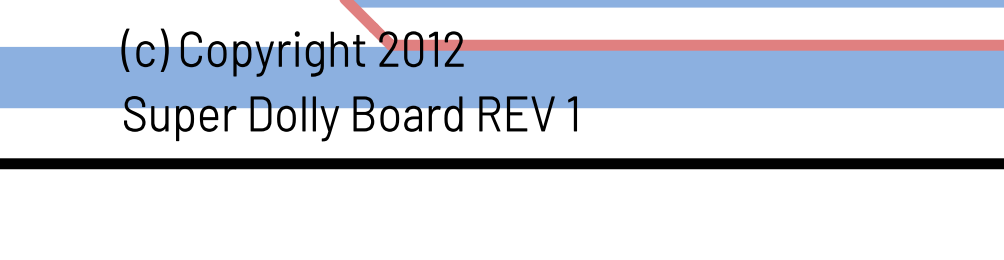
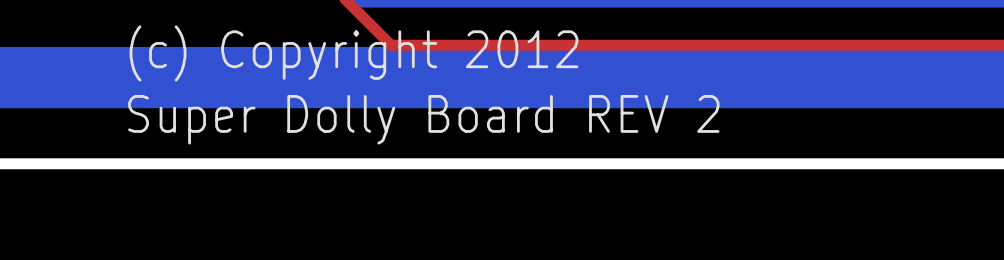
text: Super Dolly Board REV 1 (350, 118) -> Super Dolly Board REV 2 (423, 119)

